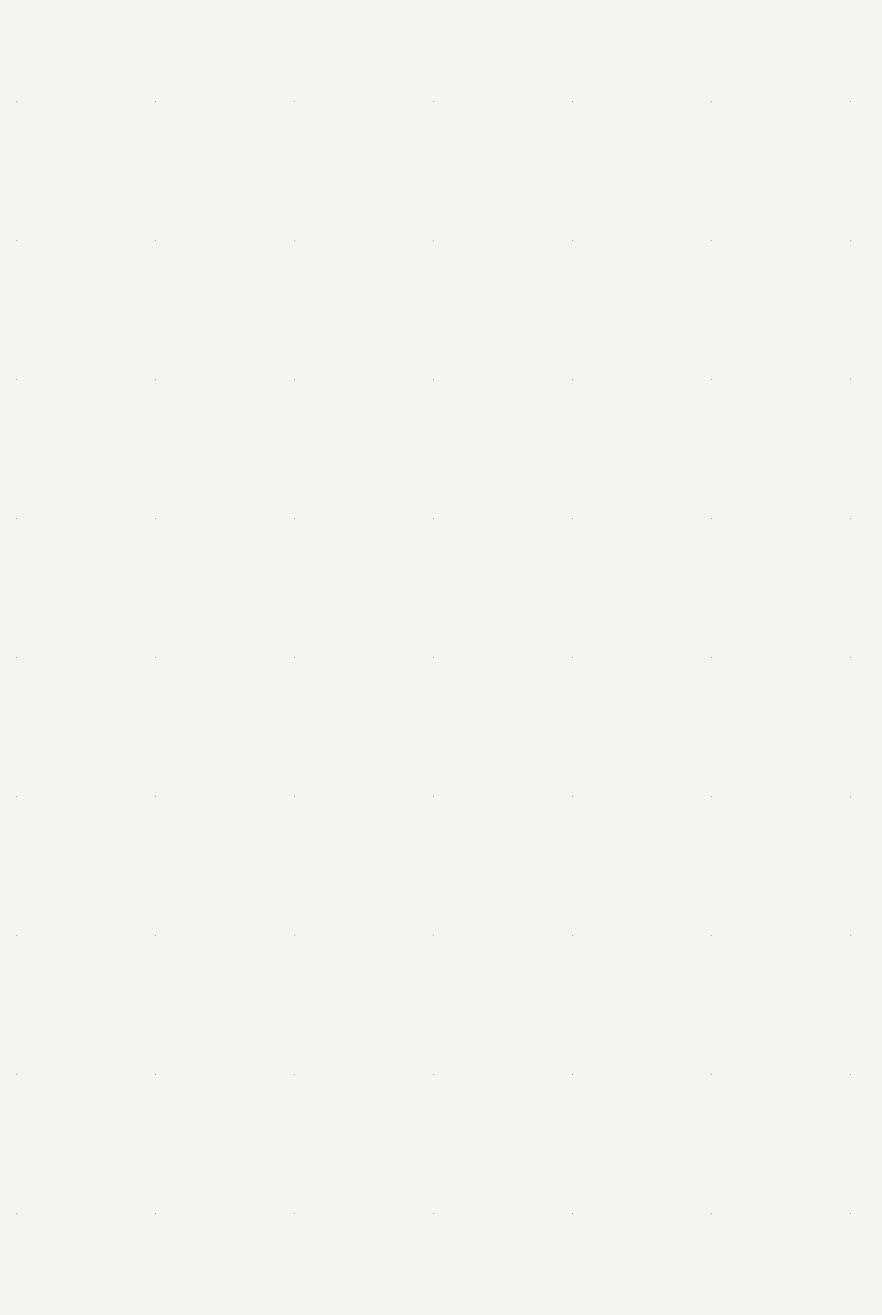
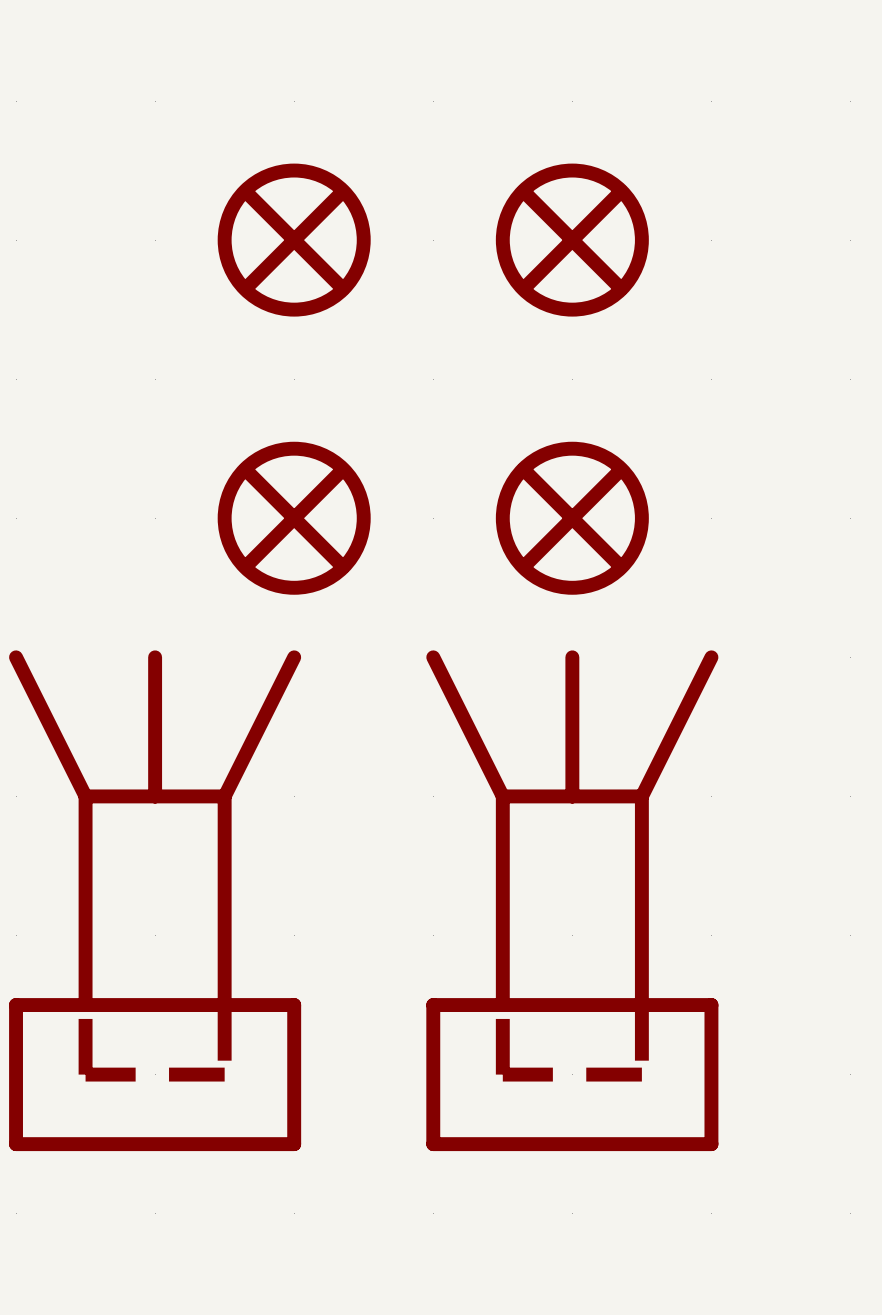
part: none -> (294, 240)
part: none -> (572, 240)
part: none -> (294, 518)
part: none -> (572, 518)
part: none -> (155, 900)
part: none -> (572, 900)

